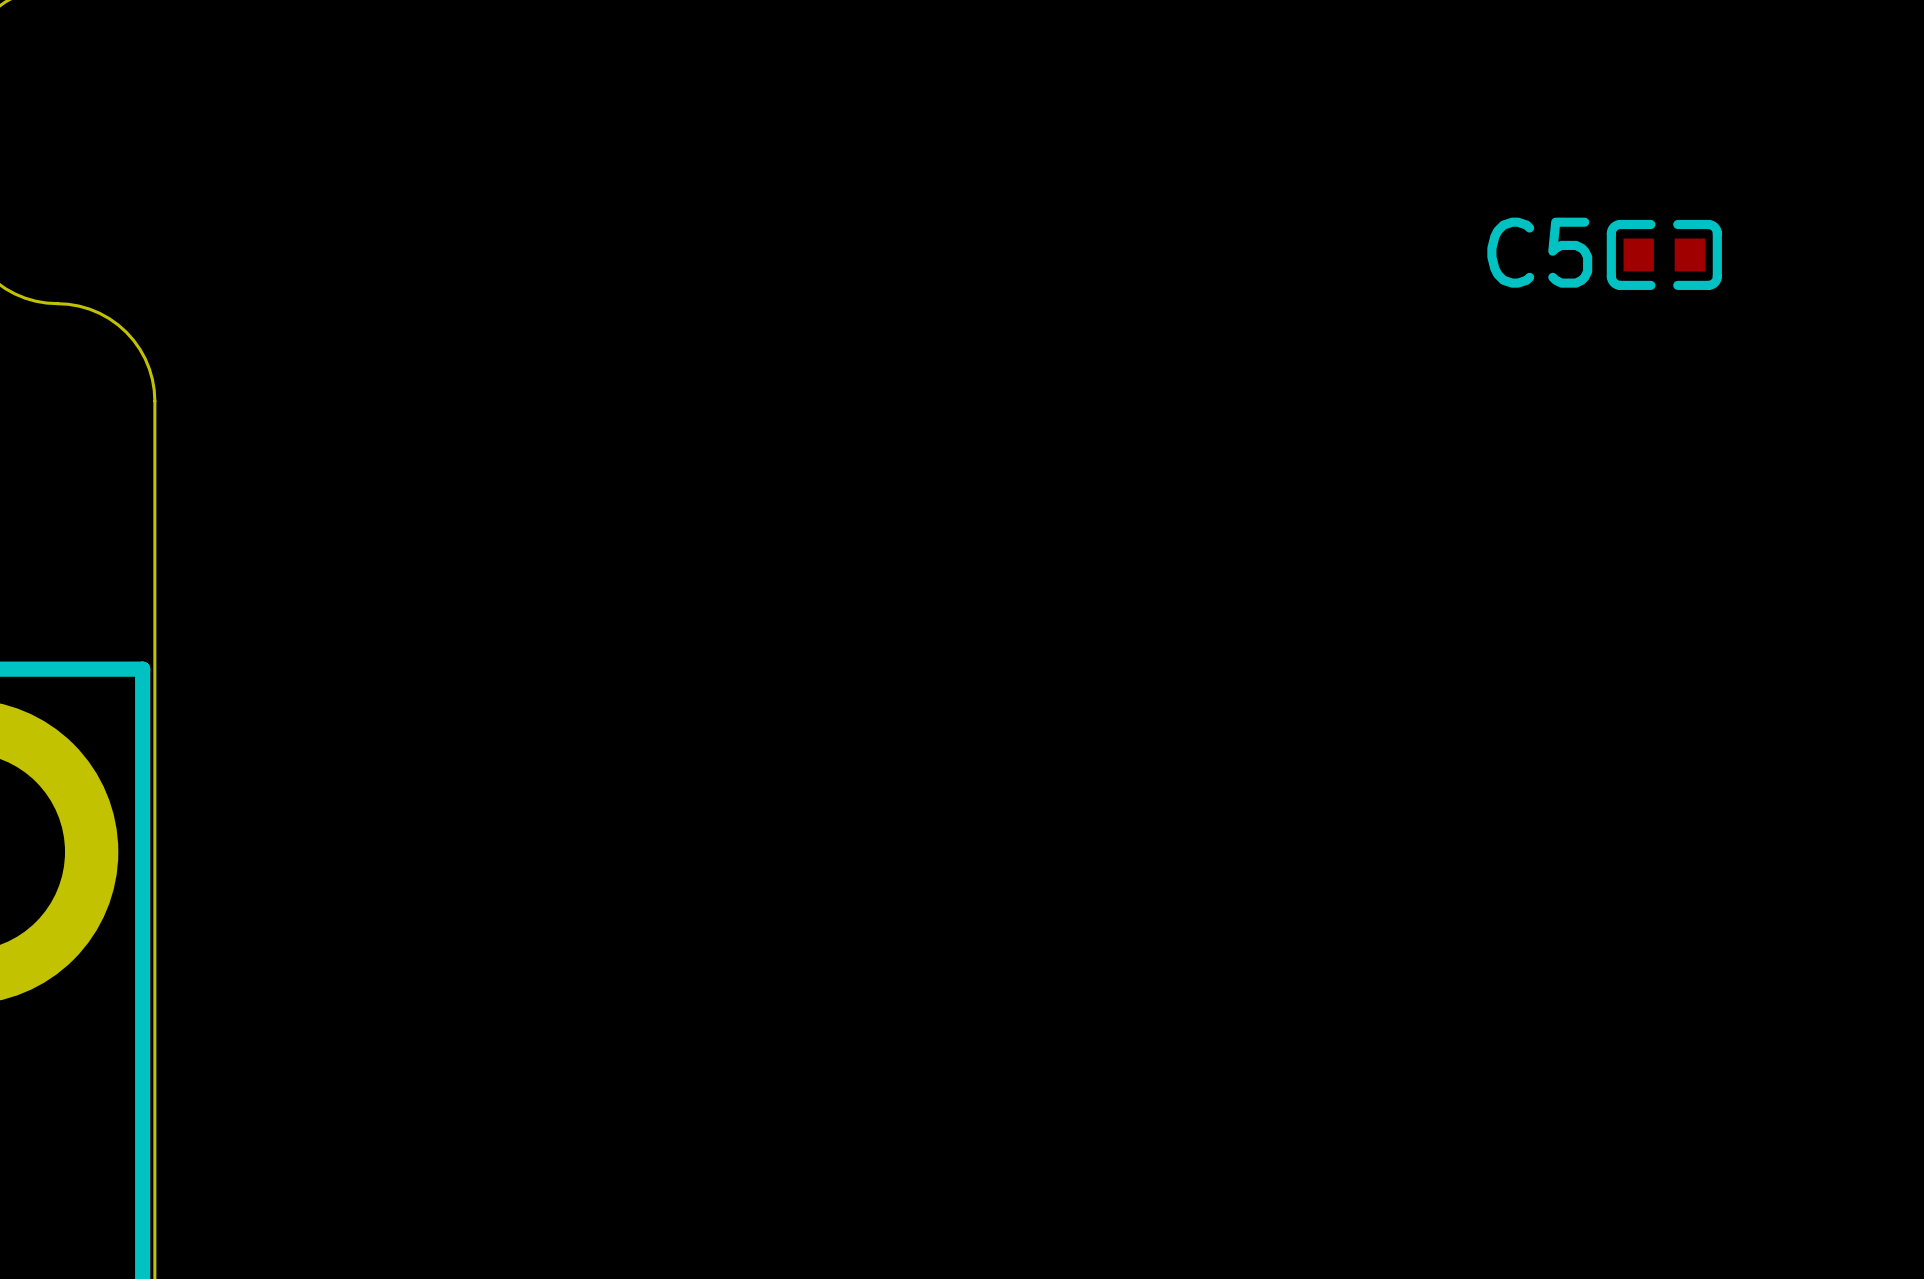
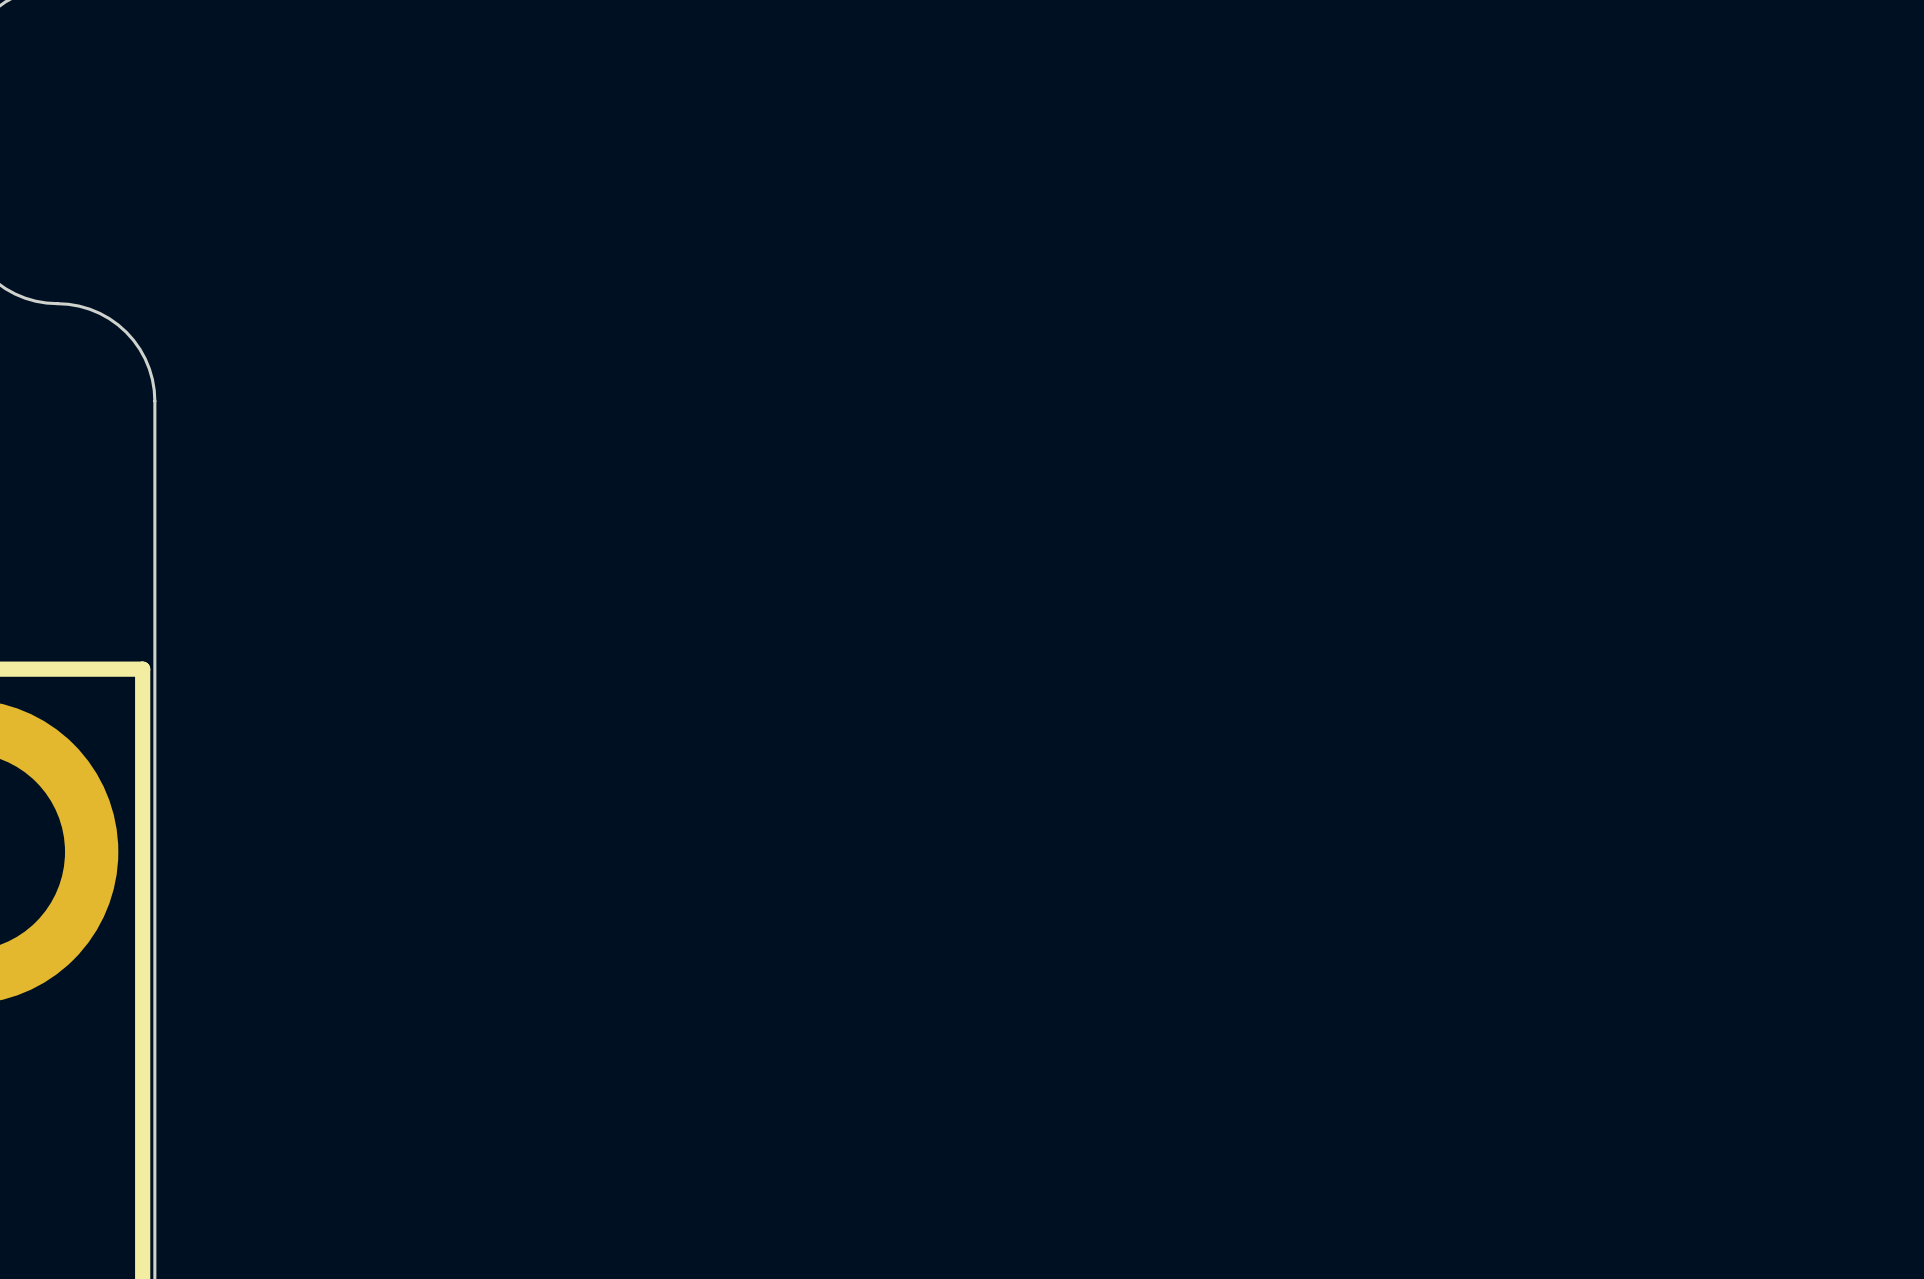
C5: (1664, 254) -> none

